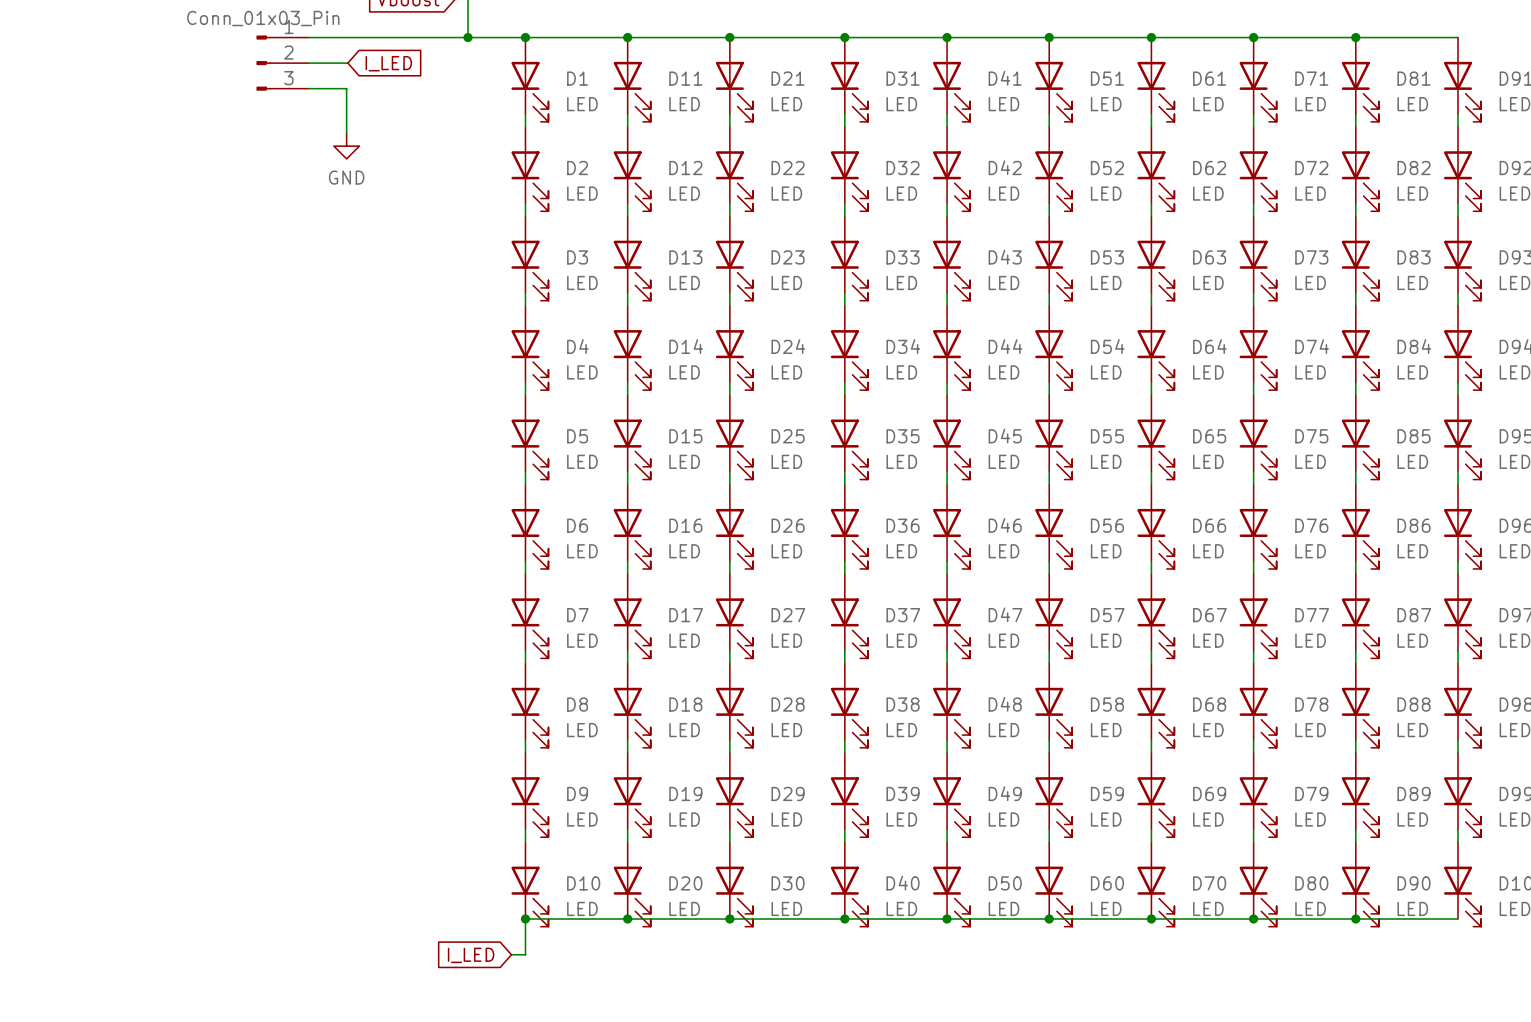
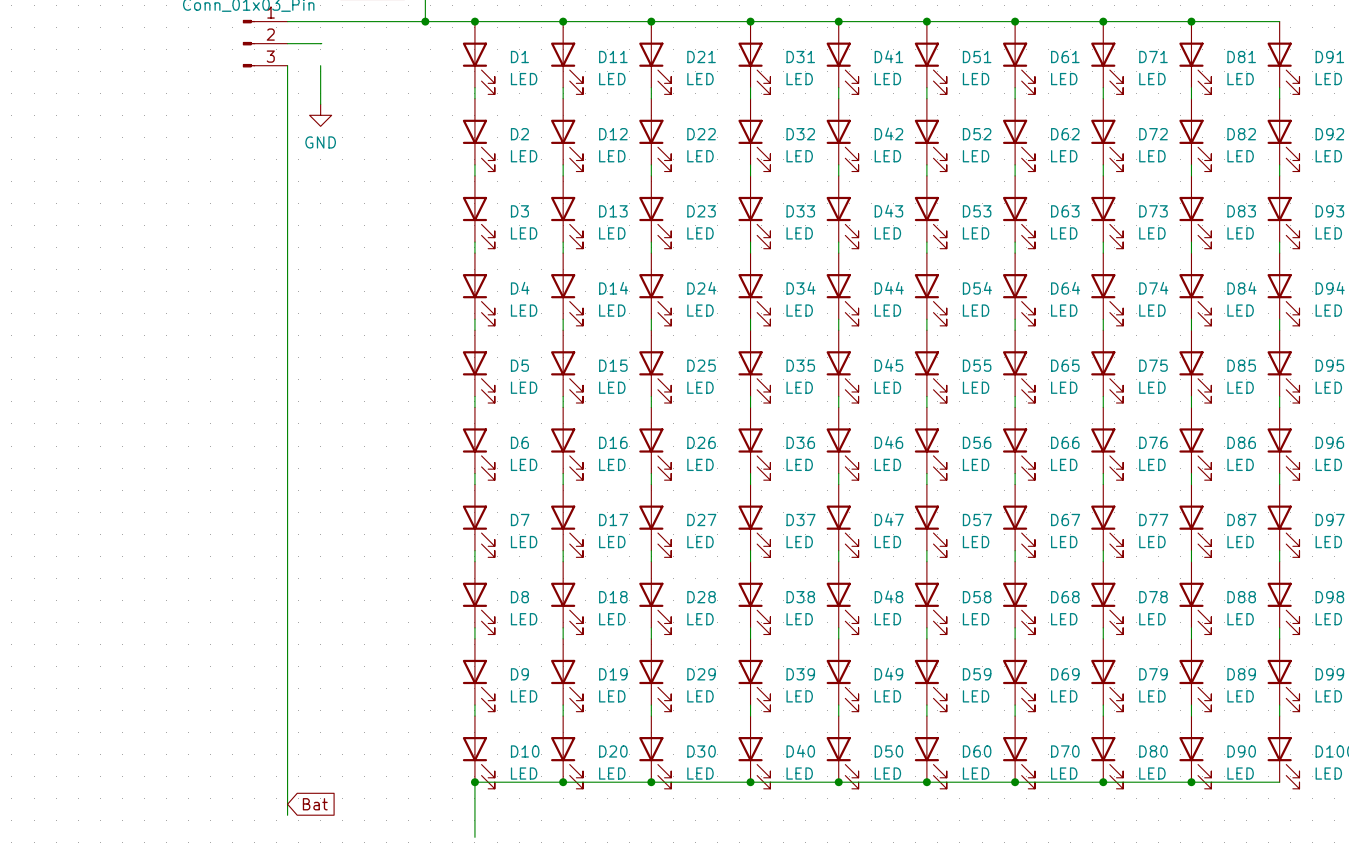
global label: I_LED (388, 63) -> none
wire: (308, 88) (346, 88) -> (287, 65) (287, 815)
global label: none -> Bat (315, 804)
wire: (511, 954) (525, 954) -> (474, 837) (474, 813)
global label: I_LED (471, 955) -> none

